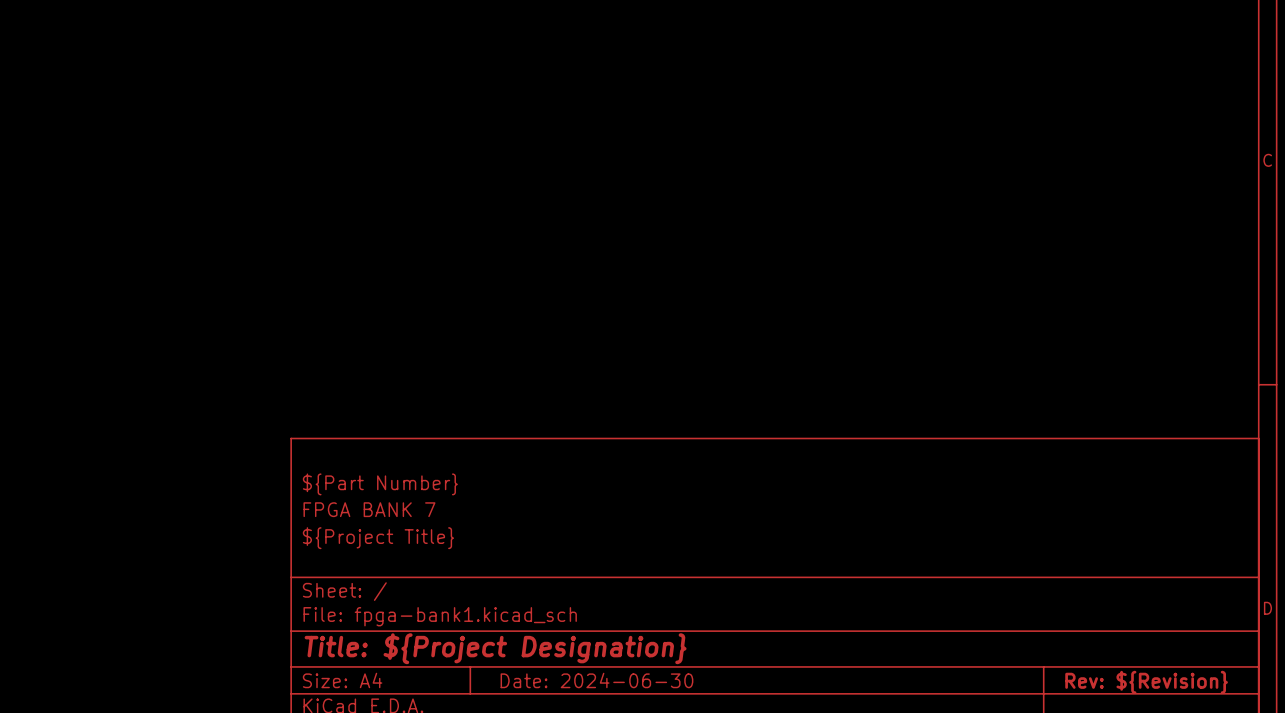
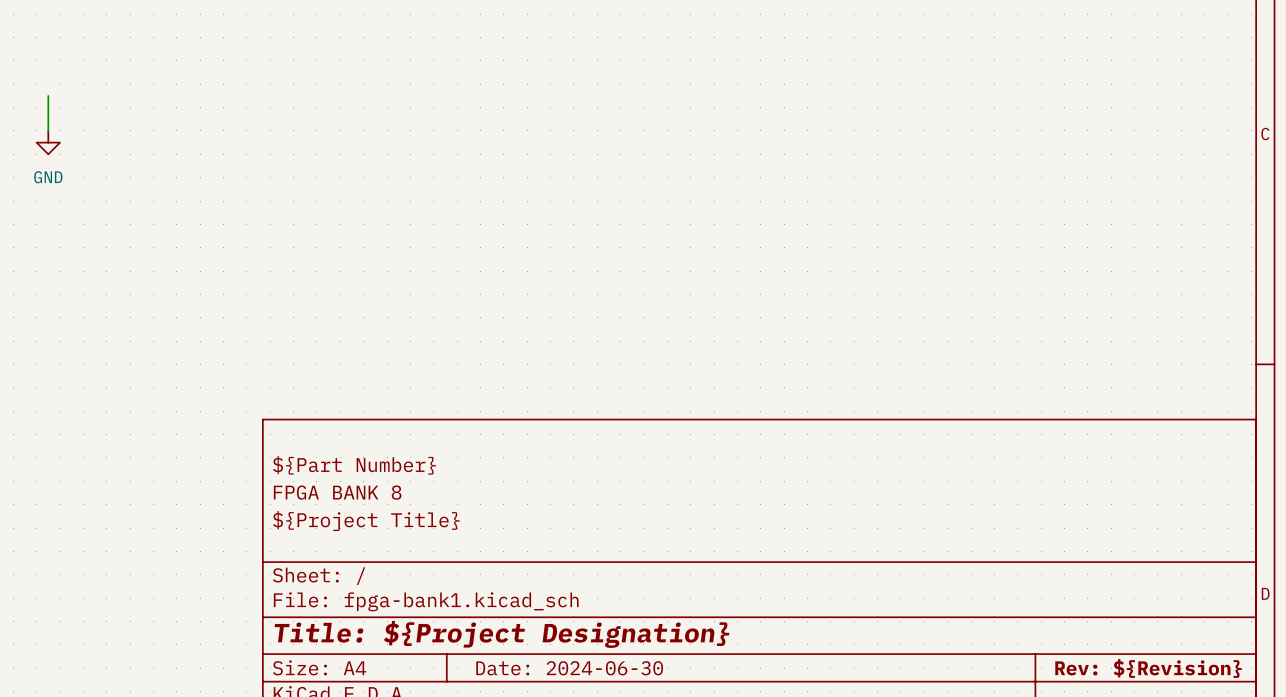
wire: none -> (48, 95) (48, 130)
power symbol: none -> GND (48, 142)
title block: FPGA BANK 7 (369, 509) -> FPGA BANK 8 (337, 492)

